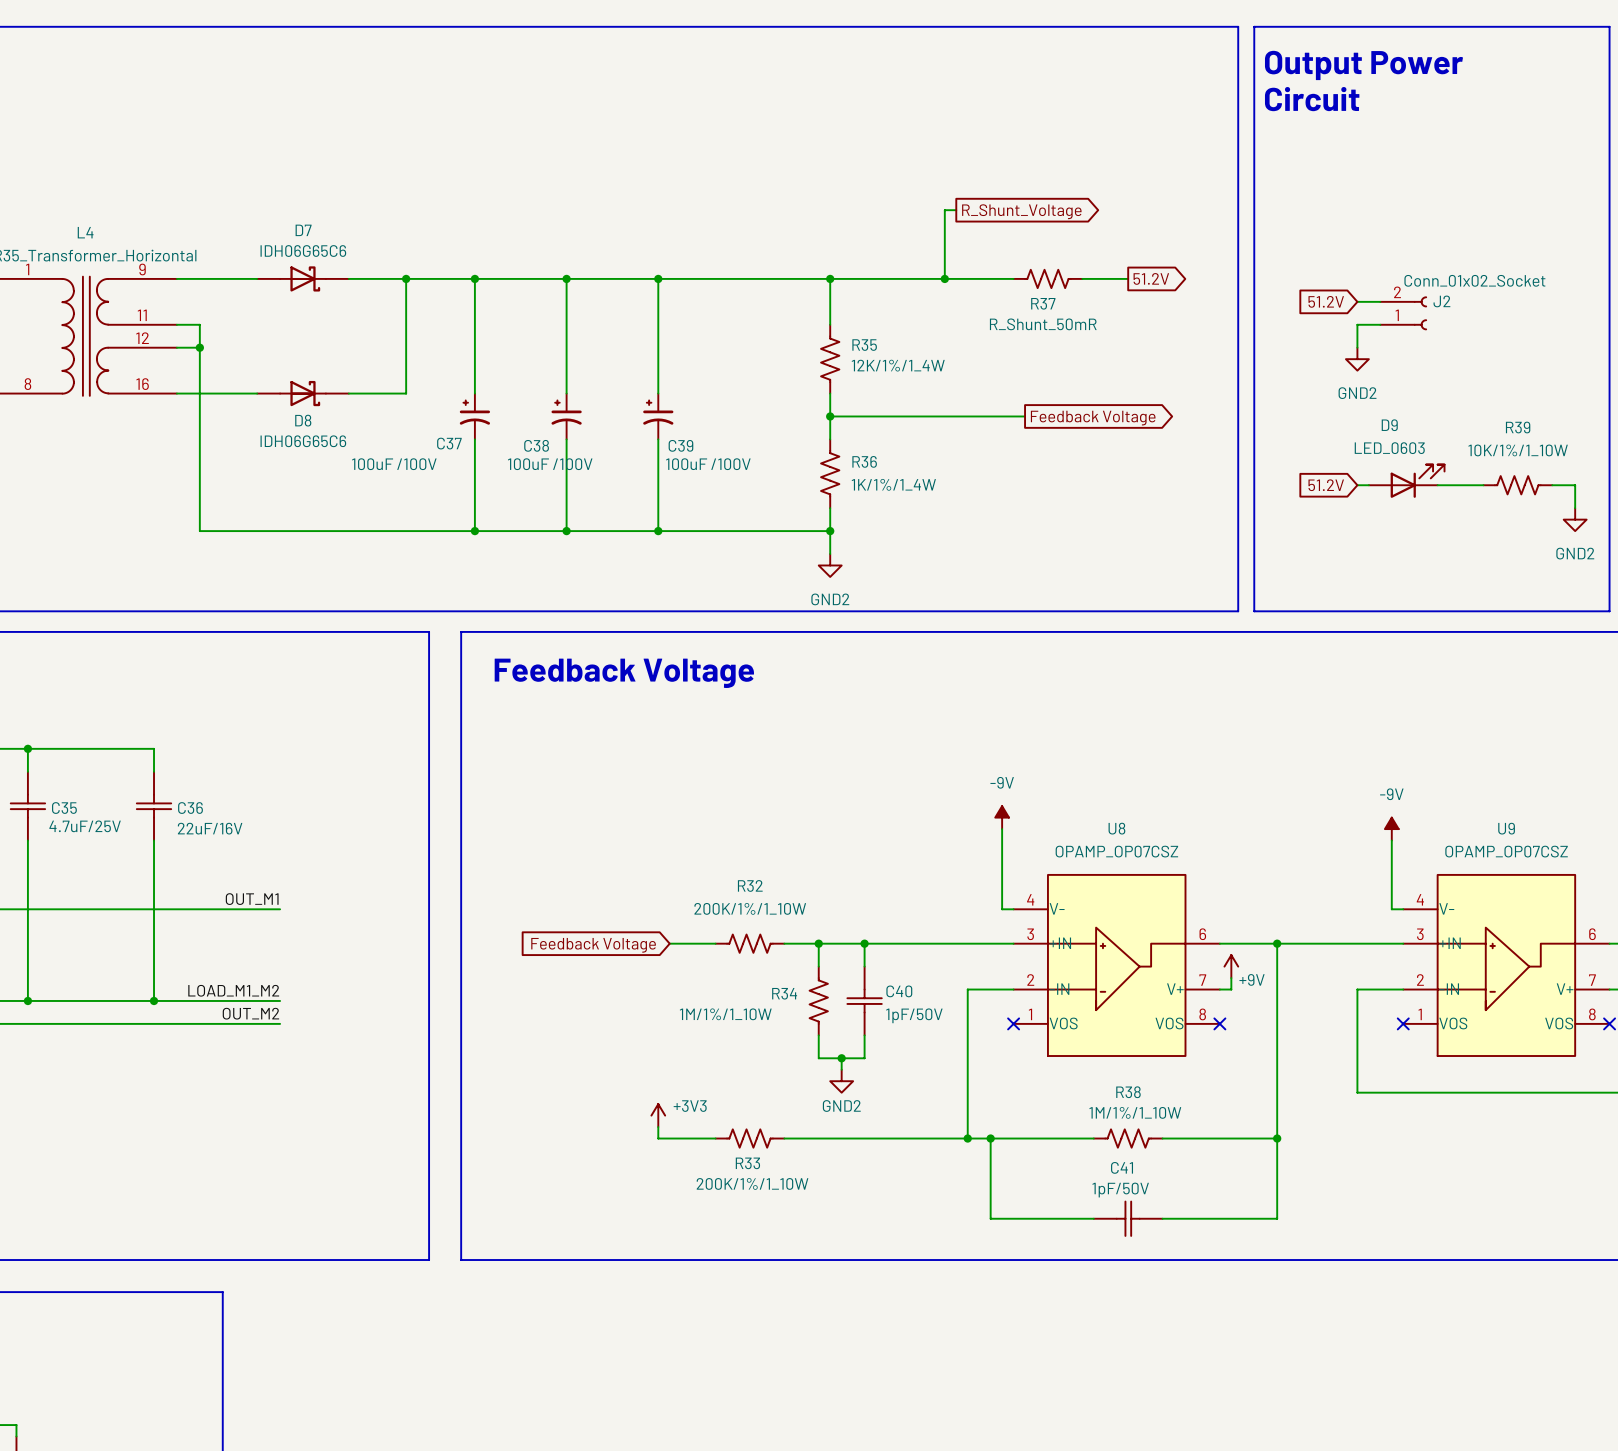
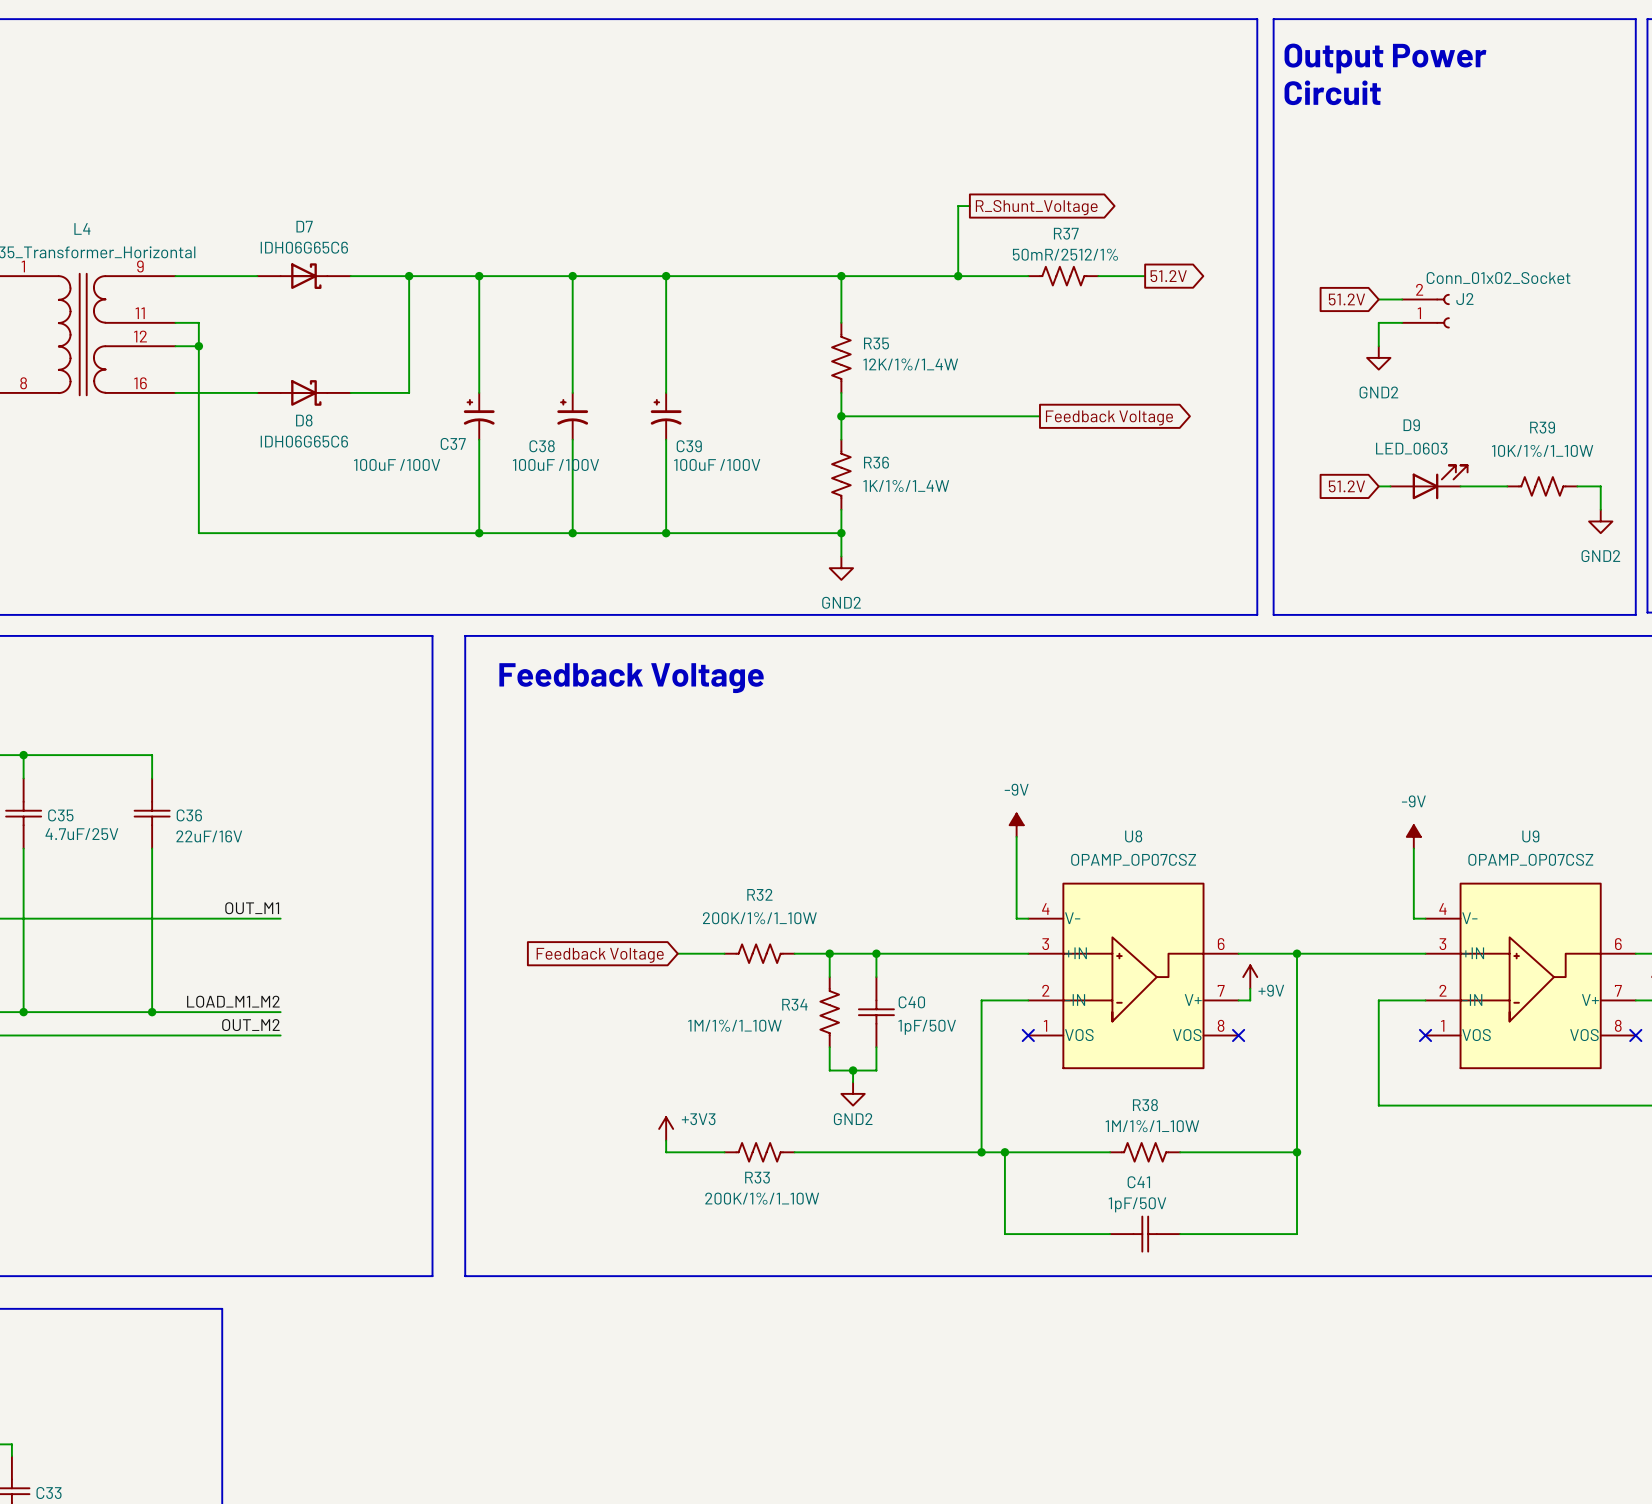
R37 name position: R37 (1043, 303) -> R37 (1066, 233)
R37 value: R_Shunt_50mR (1043, 324) -> 50mR/2512/1% (1065, 254)

